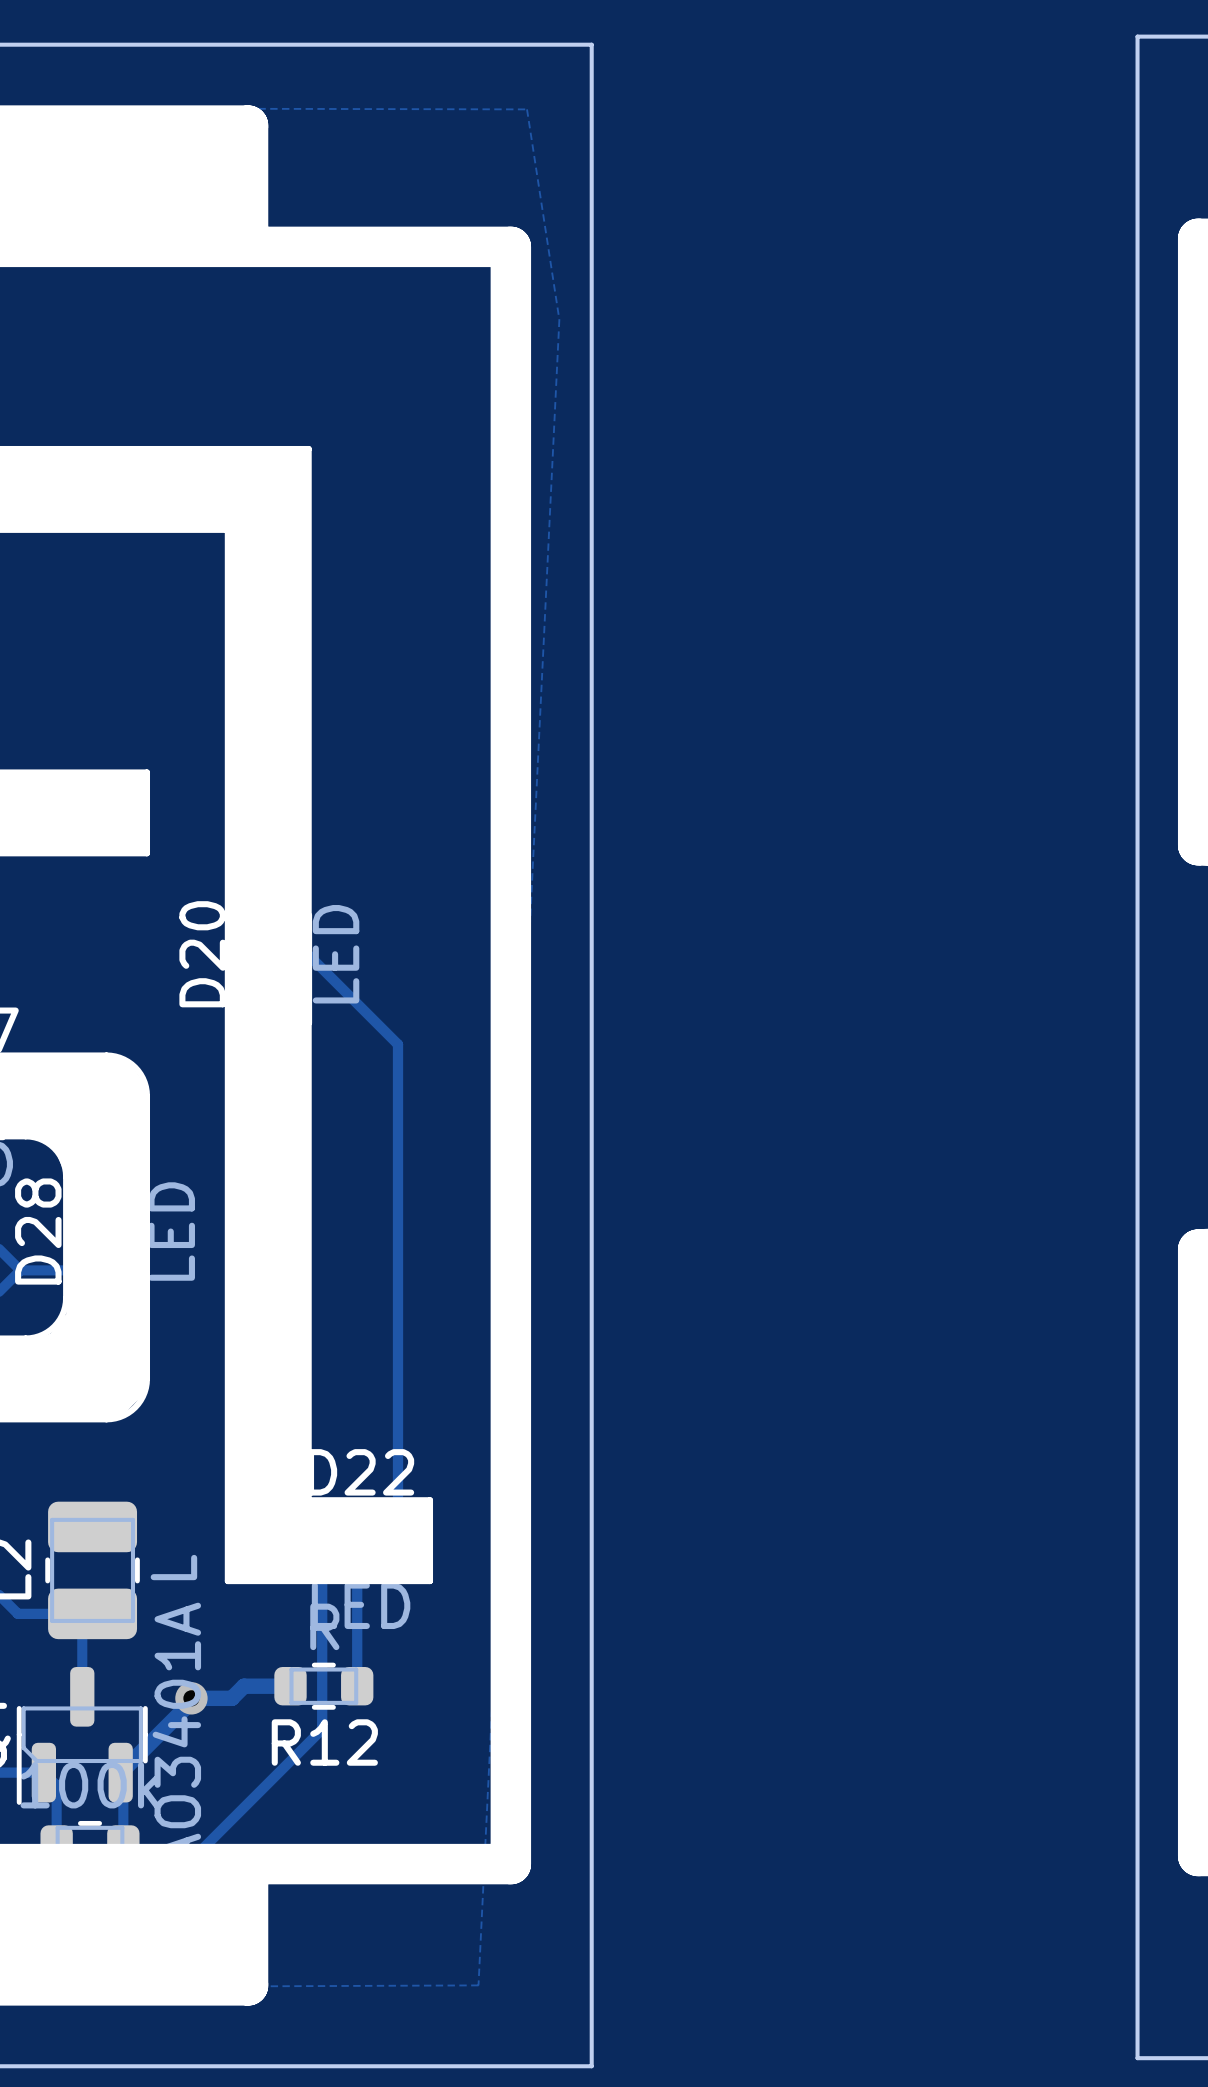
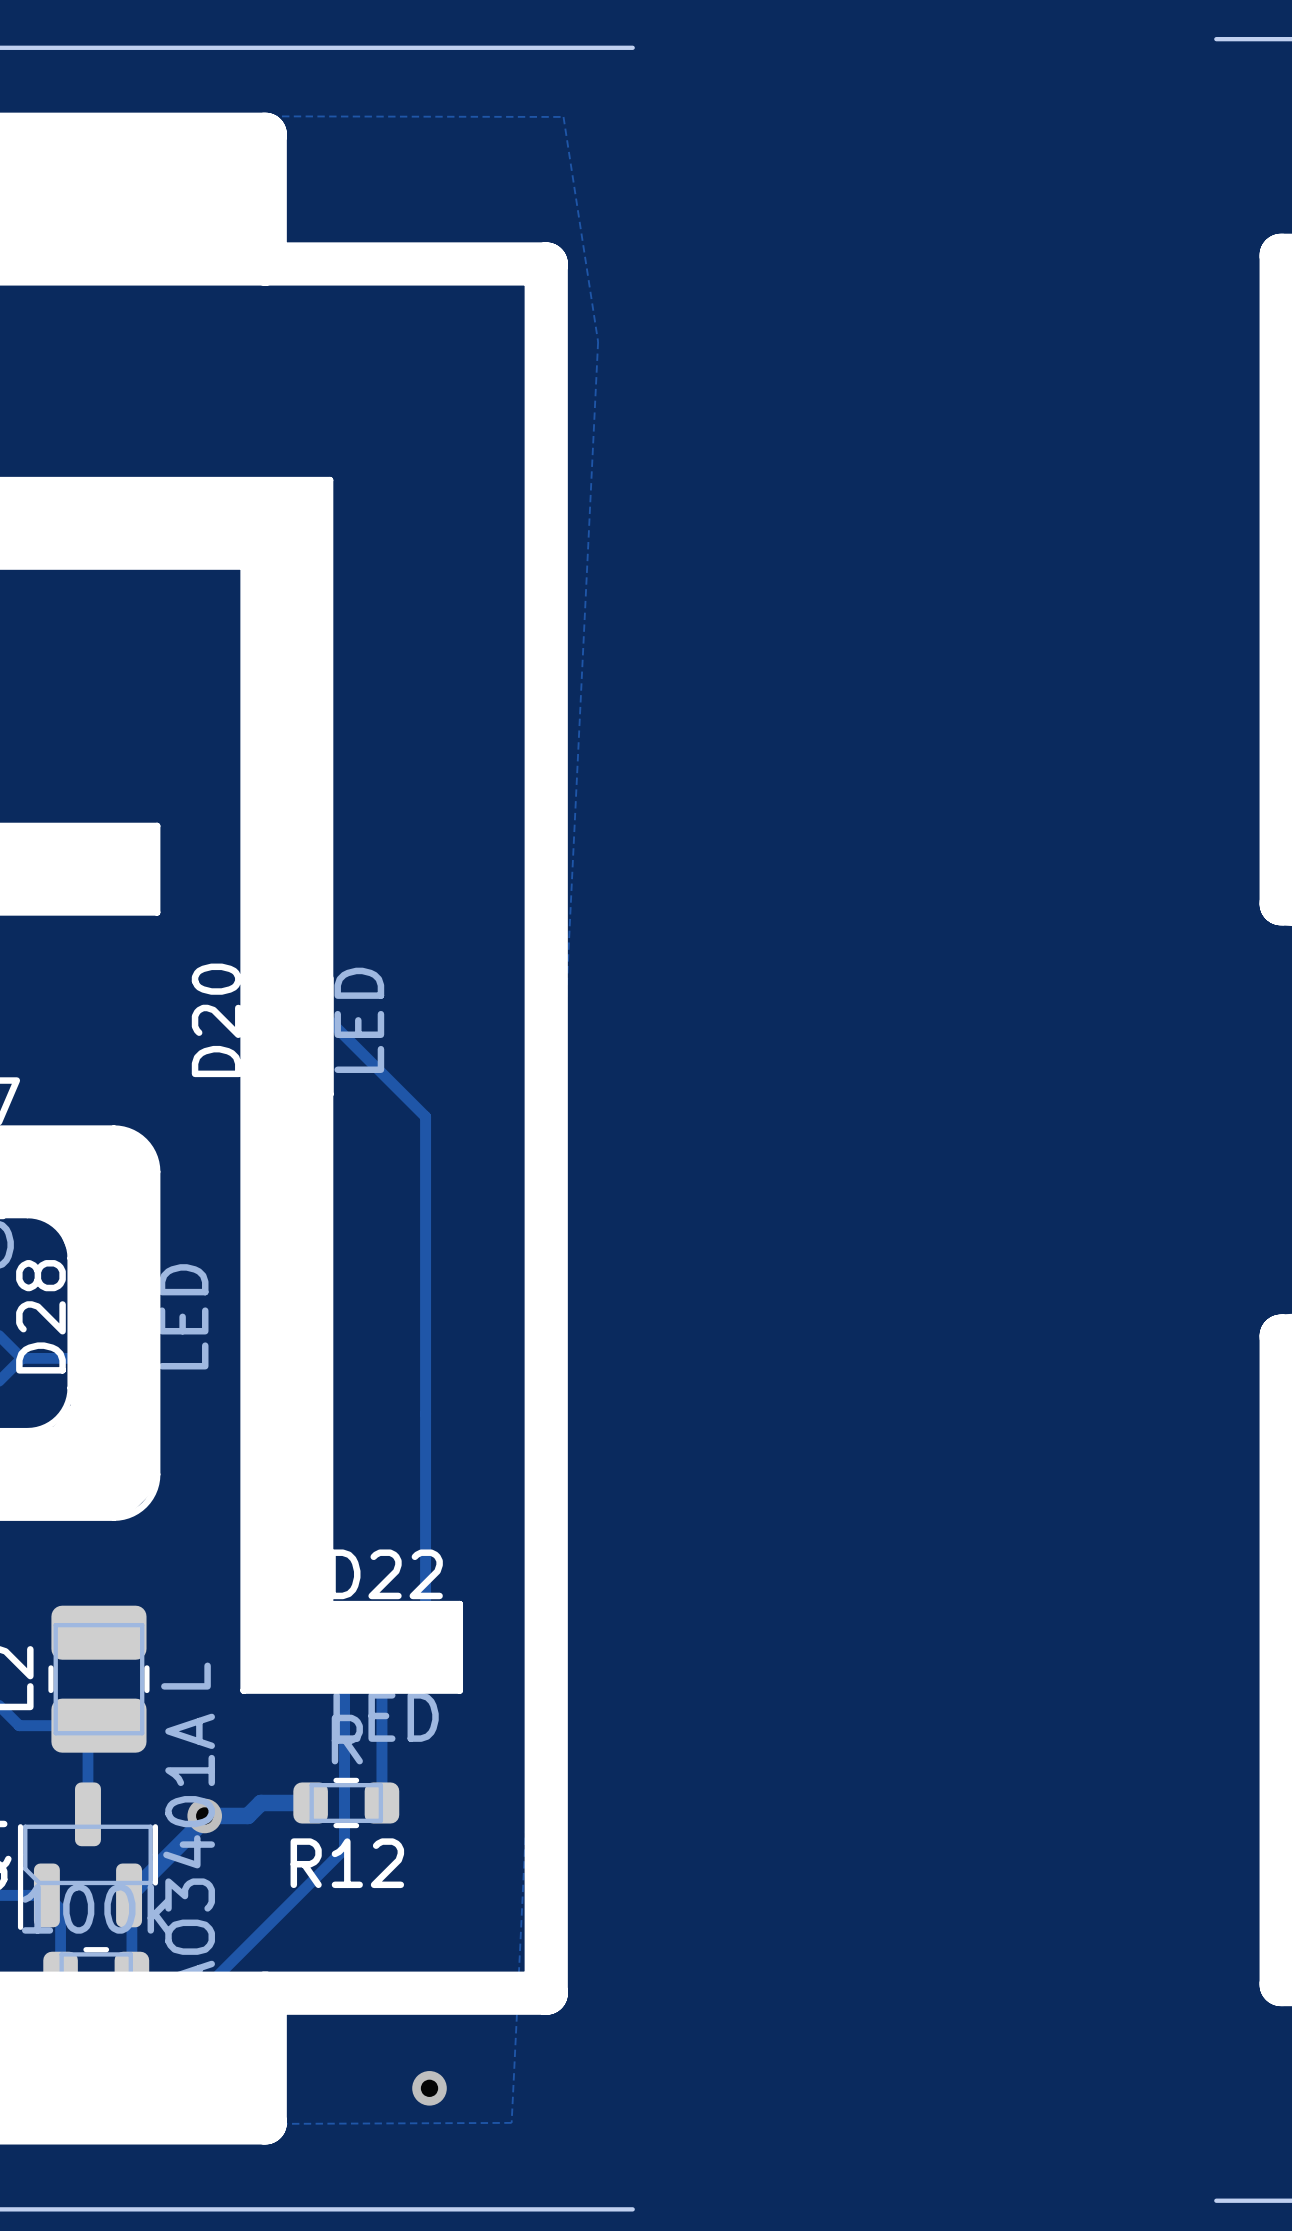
board edge: (1137, 36) (1137, 2058) -> none
board edge: (591, 44) (591, 2066) -> none
via: none -> (429, 2088)

